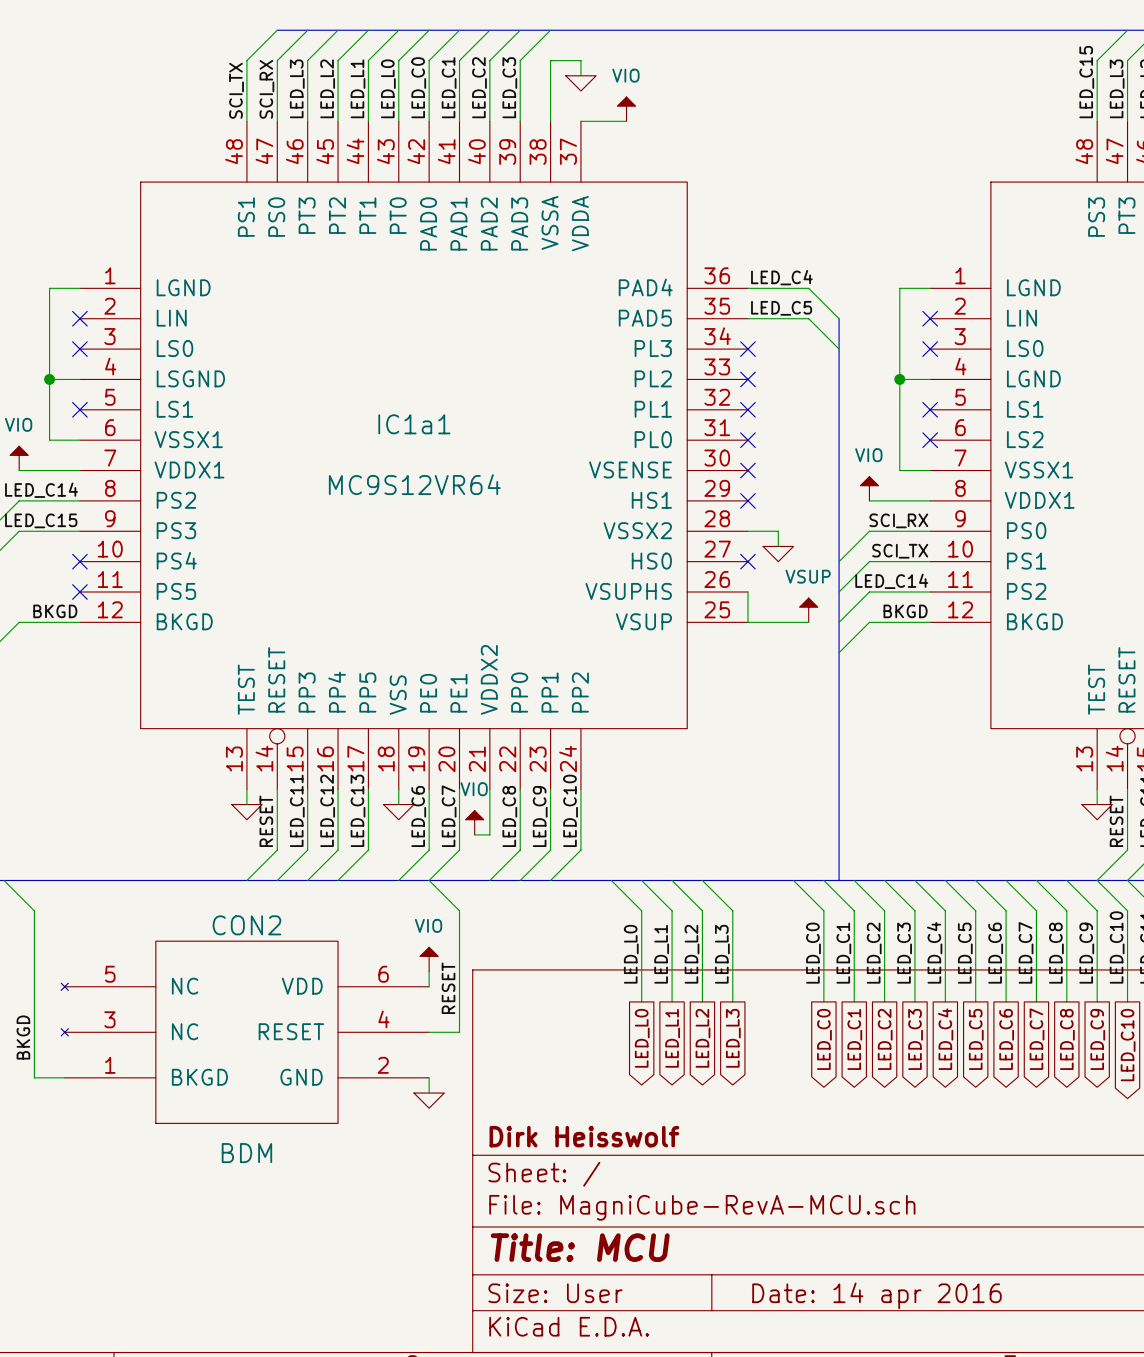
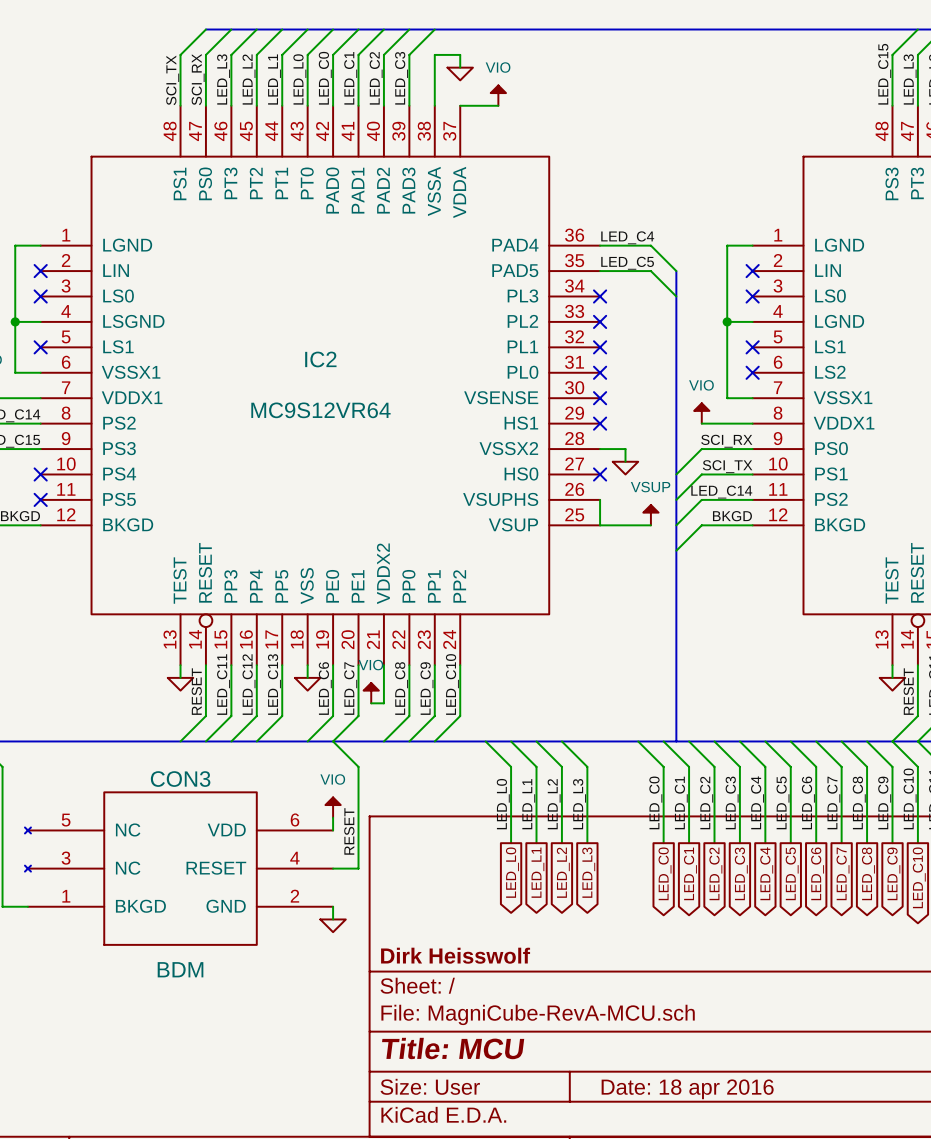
IC1a1 name: IC1a1 (414, 424) -> IC2 (320, 359)
CON2 name: CON2 (246, 925) -> CON3 (180, 779)
title block: Date: 14 apr 2016 (876, 1295) -> Date: 18 apr 2016 (687, 1089)

